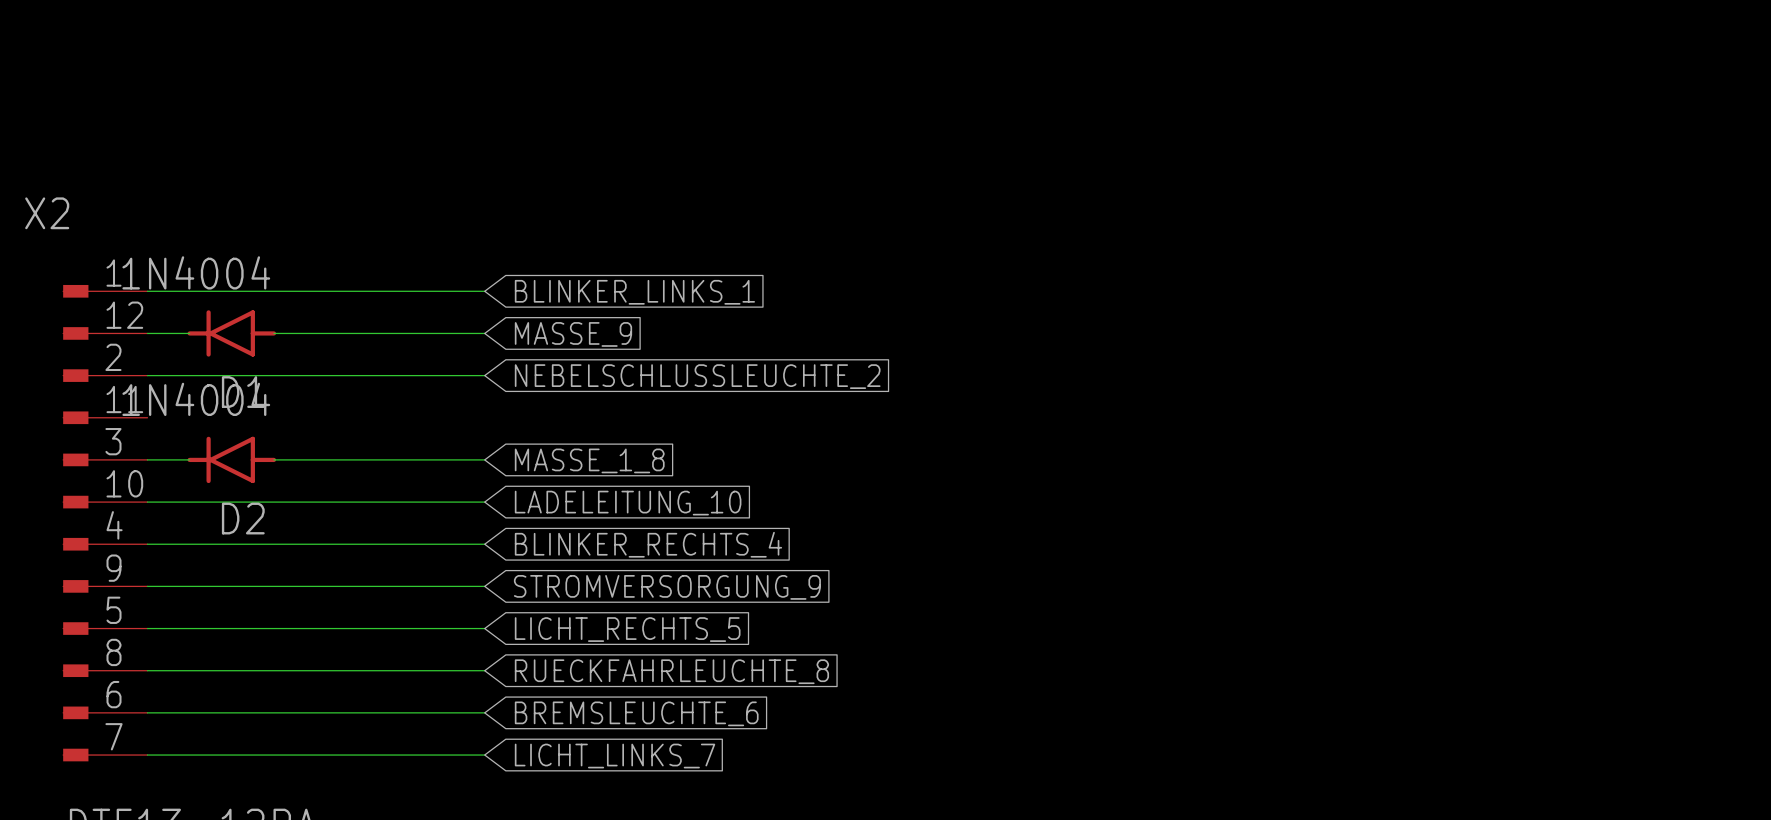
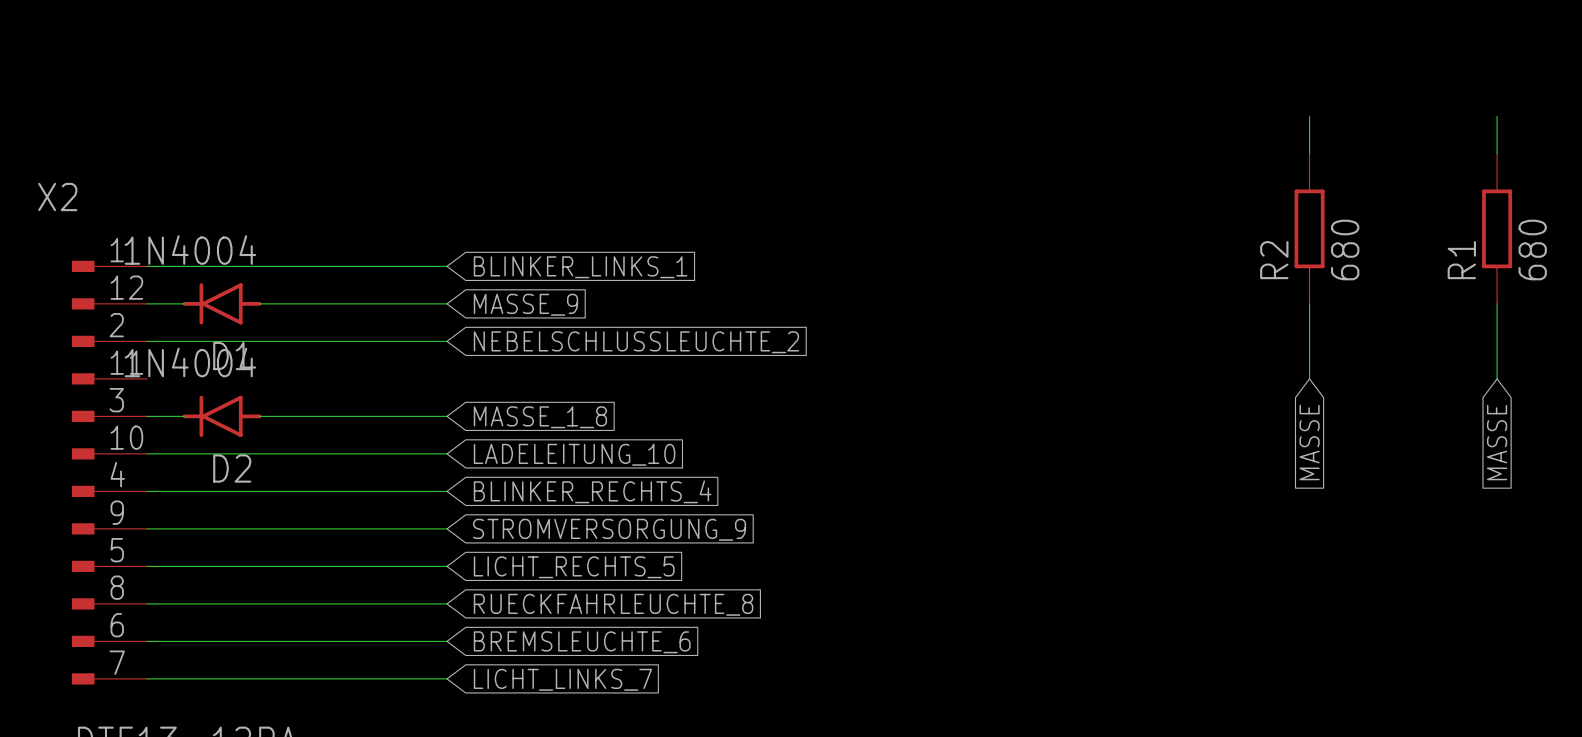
wire: none -> (1309, 116) (1309, 153)
wire: none -> (1497, 116) (1497, 153)
R2: none -> 680 (1309, 228)
R1: none -> 680 (1497, 228)
wire: none -> (1309, 303) (1309, 378)
wire: none -> (1497, 303) (1497, 378)
global label: none -> MASSE (1309, 442)
global label: none -> MASSE (1497, 442)

